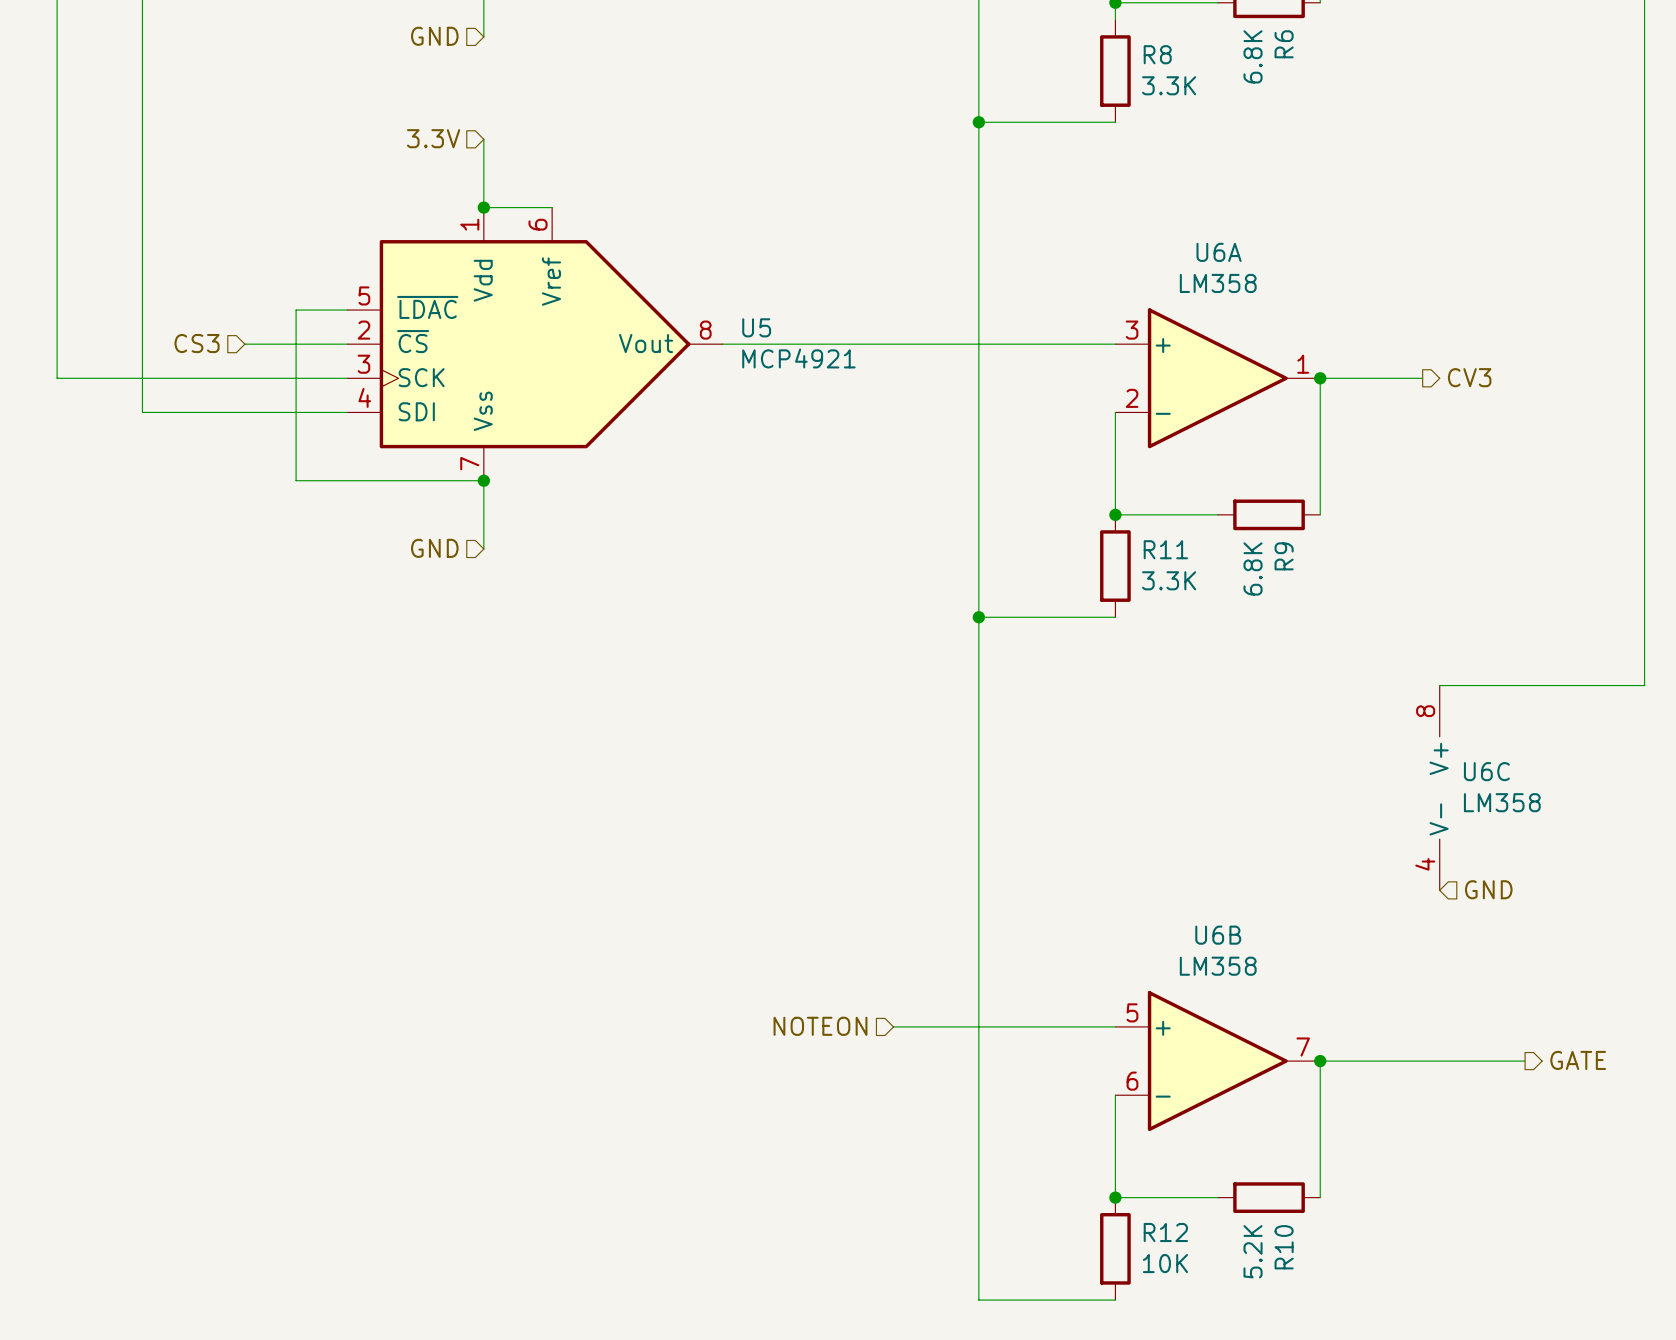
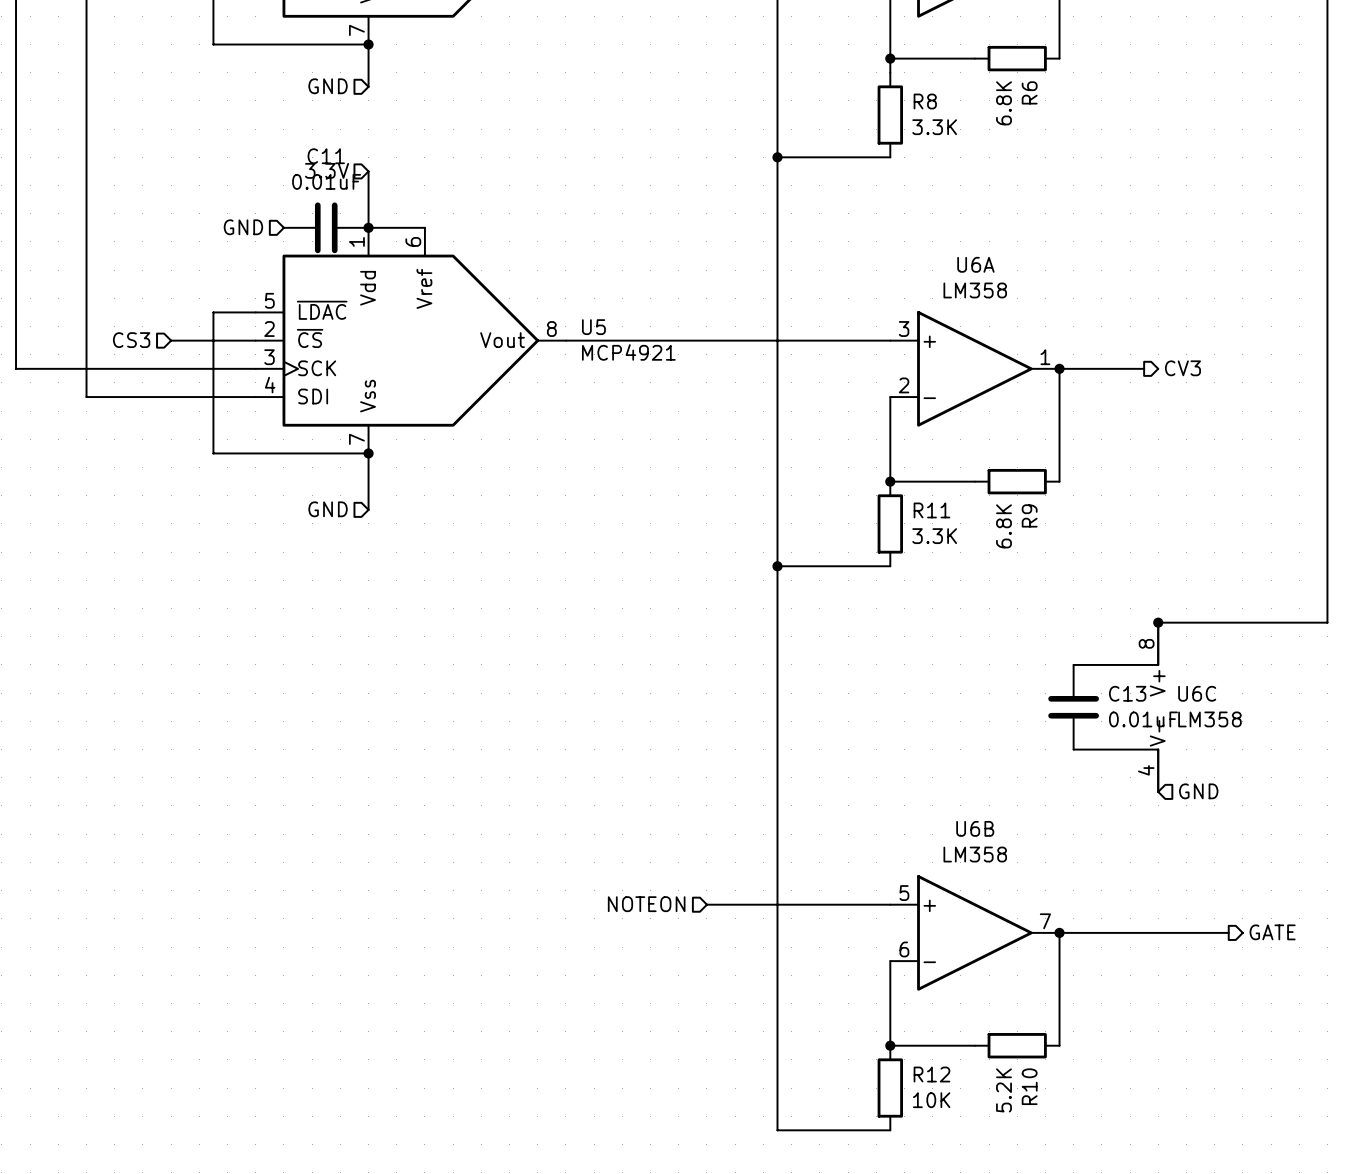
hierarchical label: none -> GND (243, 227)
C11: none -> 0.01uF (326, 227)
wire: none -> (1158, 622) (1158, 664) (1073, 664)
junction: none -> (1158, 622)
C13: none -> 0.01uF (1073, 707)
wire: none -> (1073, 749) (1158, 749) (1158, 791)

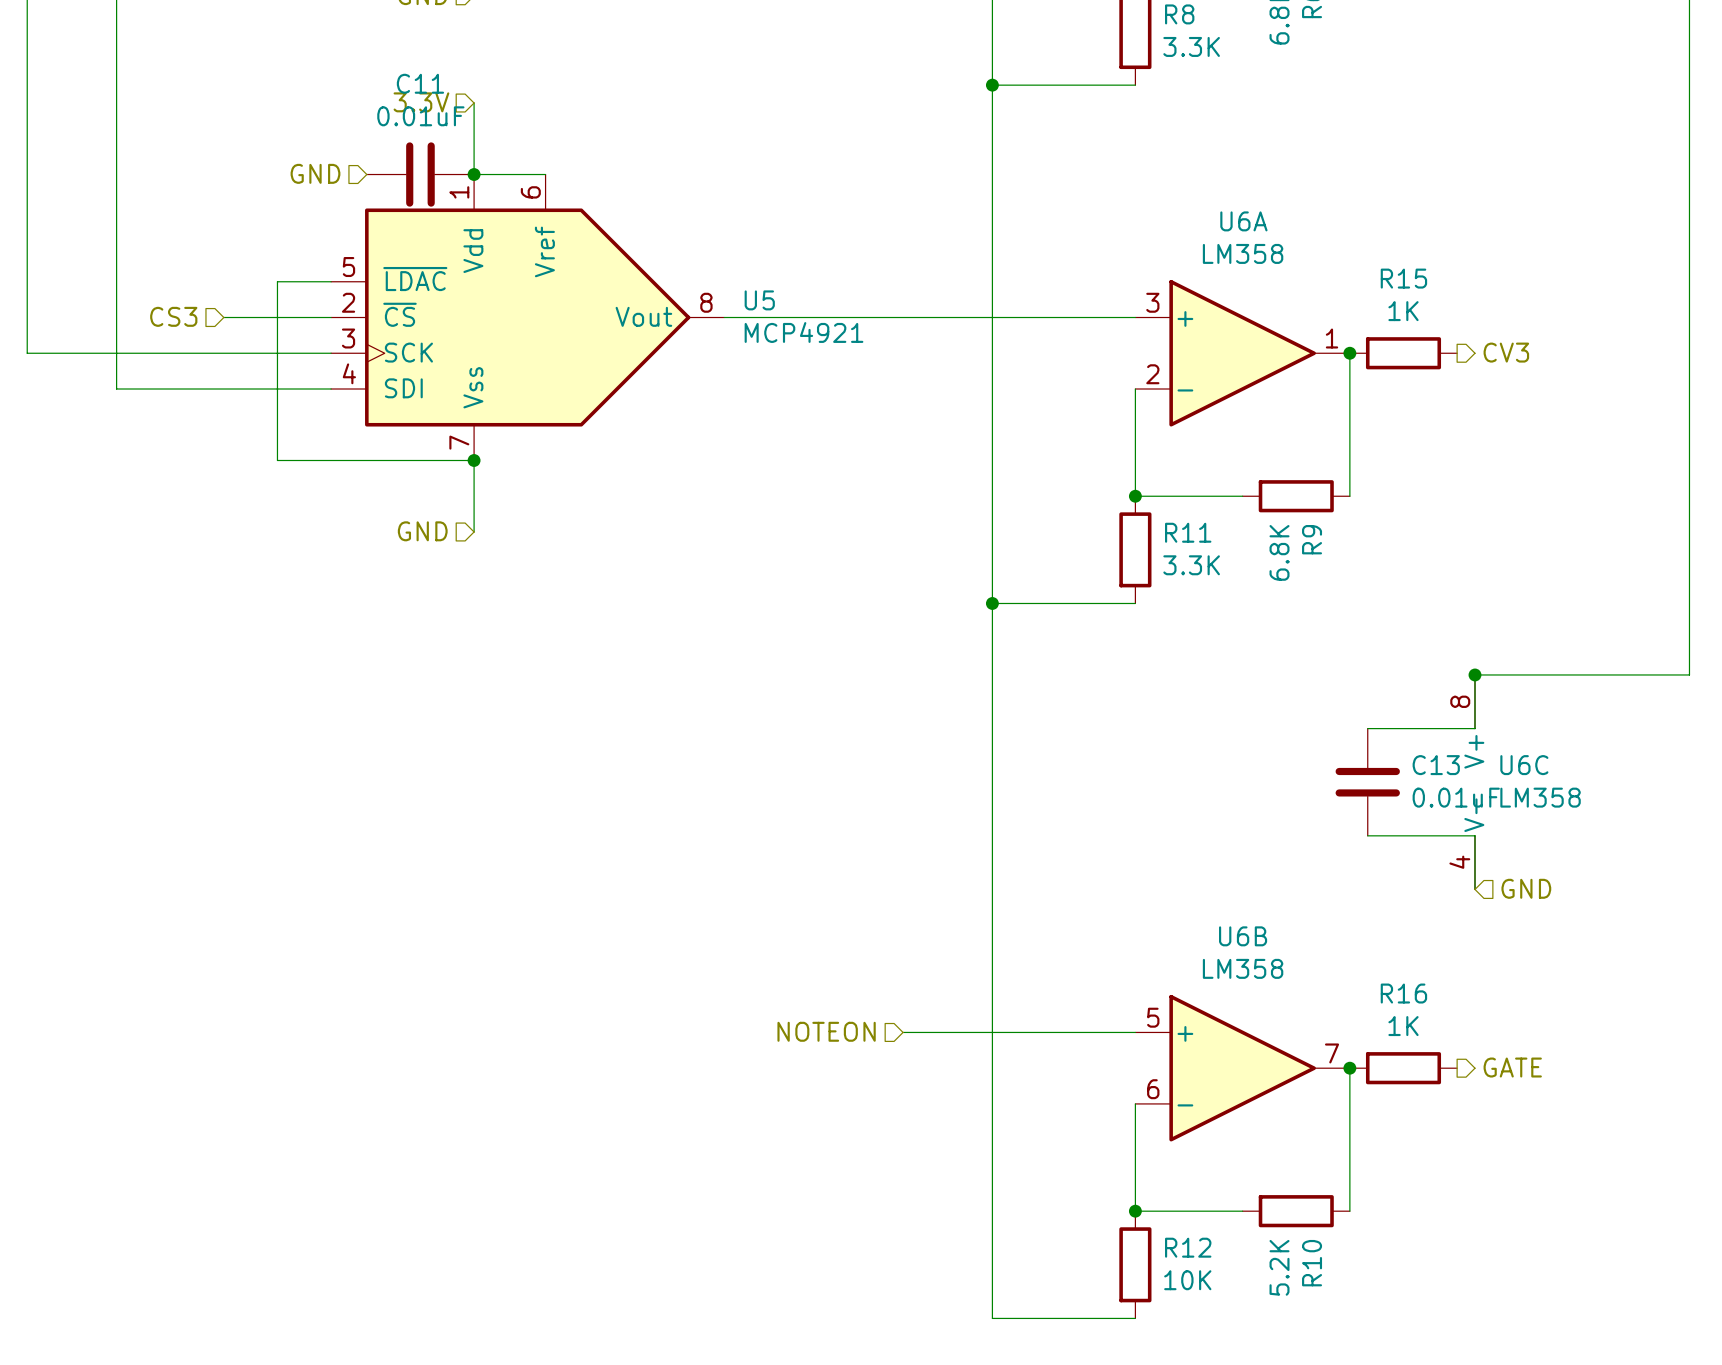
wire: (1059, 368) (1144, 368) -> none
R15: none -> 1K (1403, 353)
wire: (1059, 932) (1228, 932) -> none
R16: none -> 1K (1403, 1068)
hierarchical label position: GATE (1272, 932) -> GATE (1512, 1067)

